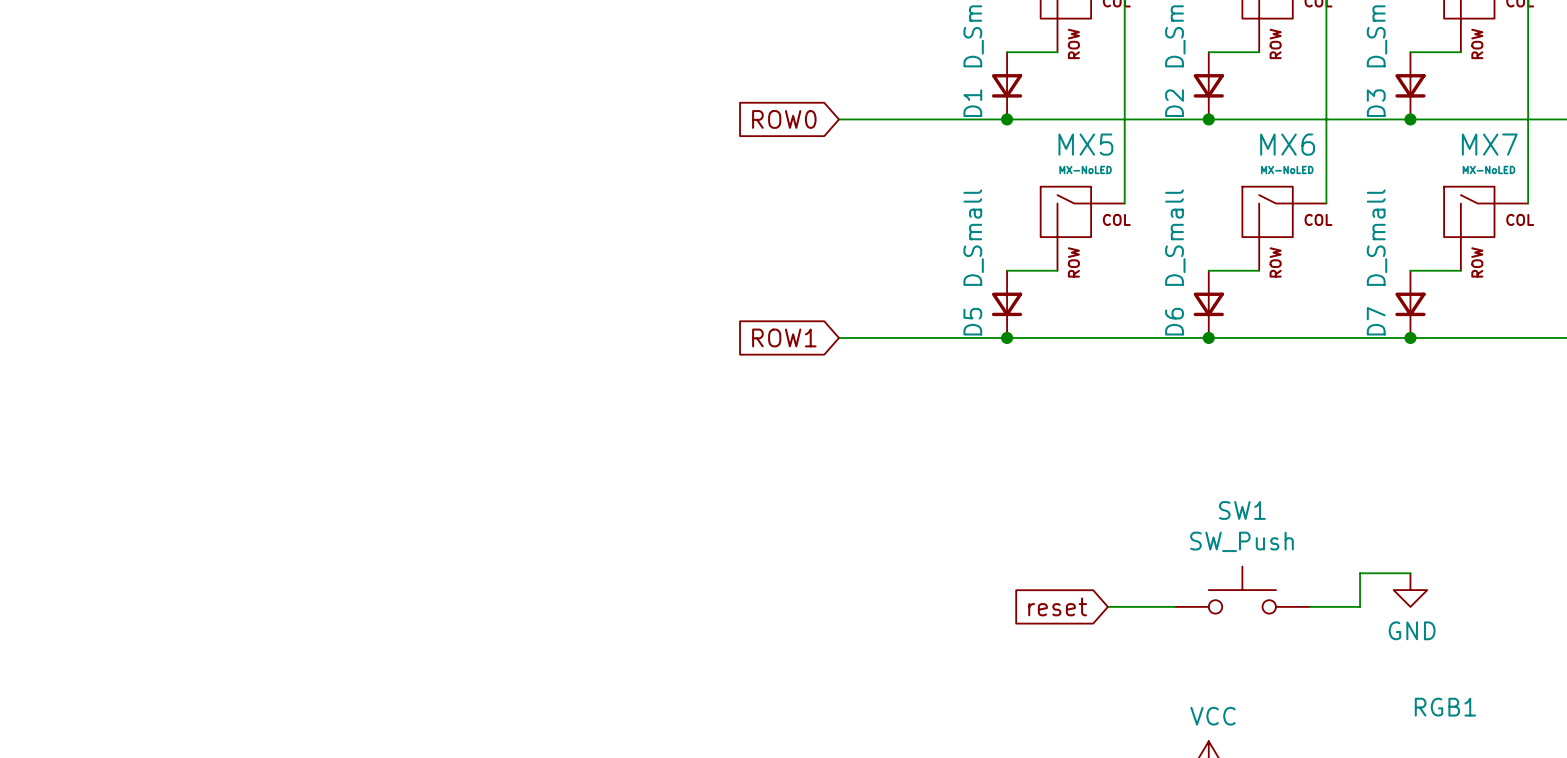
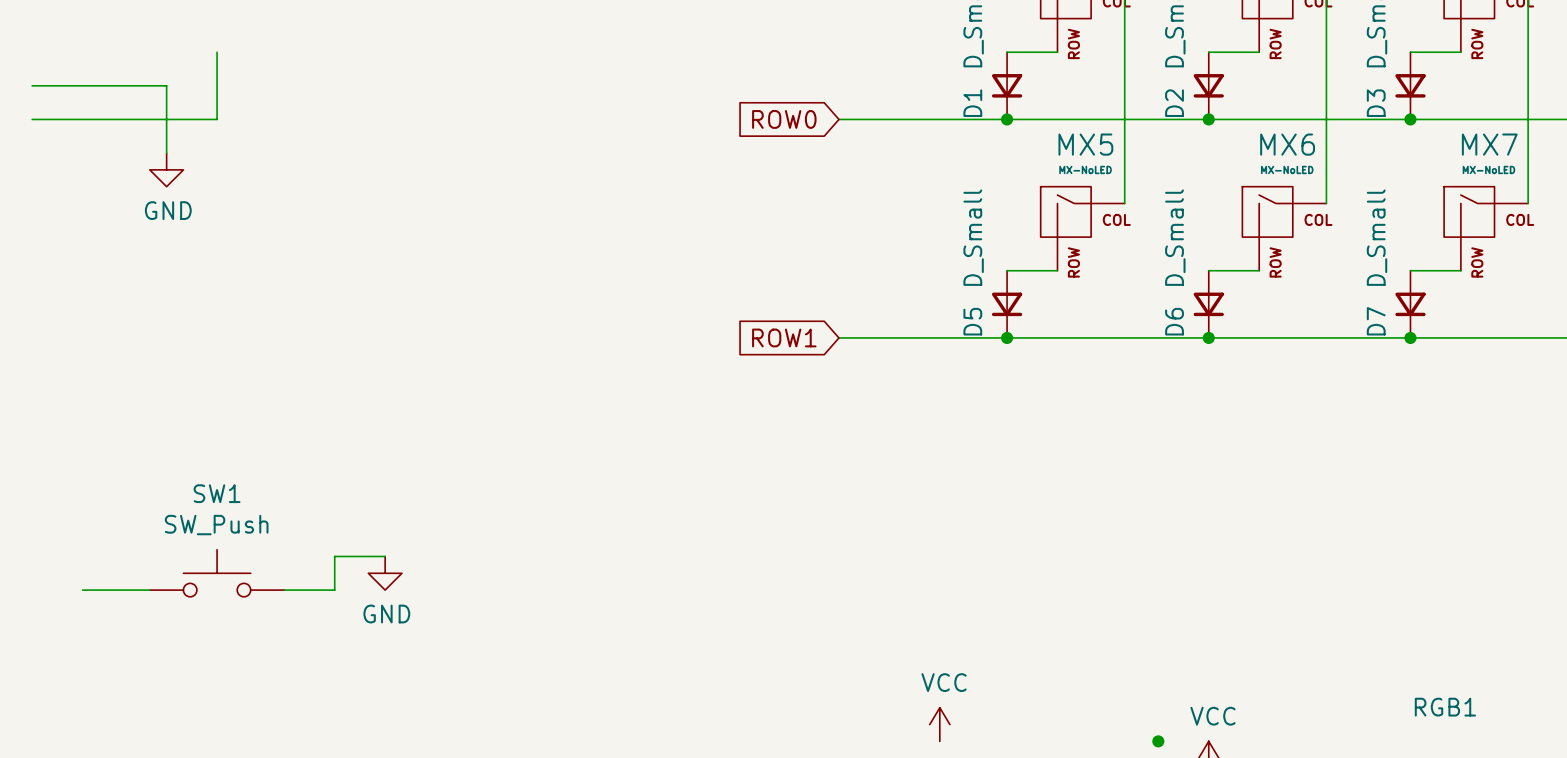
wire: none -> (217, 52) (217, 119) (32, 119)
wire: none -> (32, 85) (166, 85) (166, 153)
power symbol: none -> GND (166, 169)
wire: none -> (385, 556) (334, 556) (334, 590) (284, 590)
power symbol: none -> GND (385, 573)
wire: (1410, 573) (1360, 573) (1360, 606) (1309, 606) -> none
wire: none -> (82, 590) (149, 590)
SW1 position: (1242, 590) -> (217, 573)
power symbol: GND (1410, 590) -> none
global label: reset (1057, 606) -> none
wire: (1107, 606) (1175, 606) -> none
power symbol: none -> VCC (939, 724)
junction: none -> (1158, 741)

